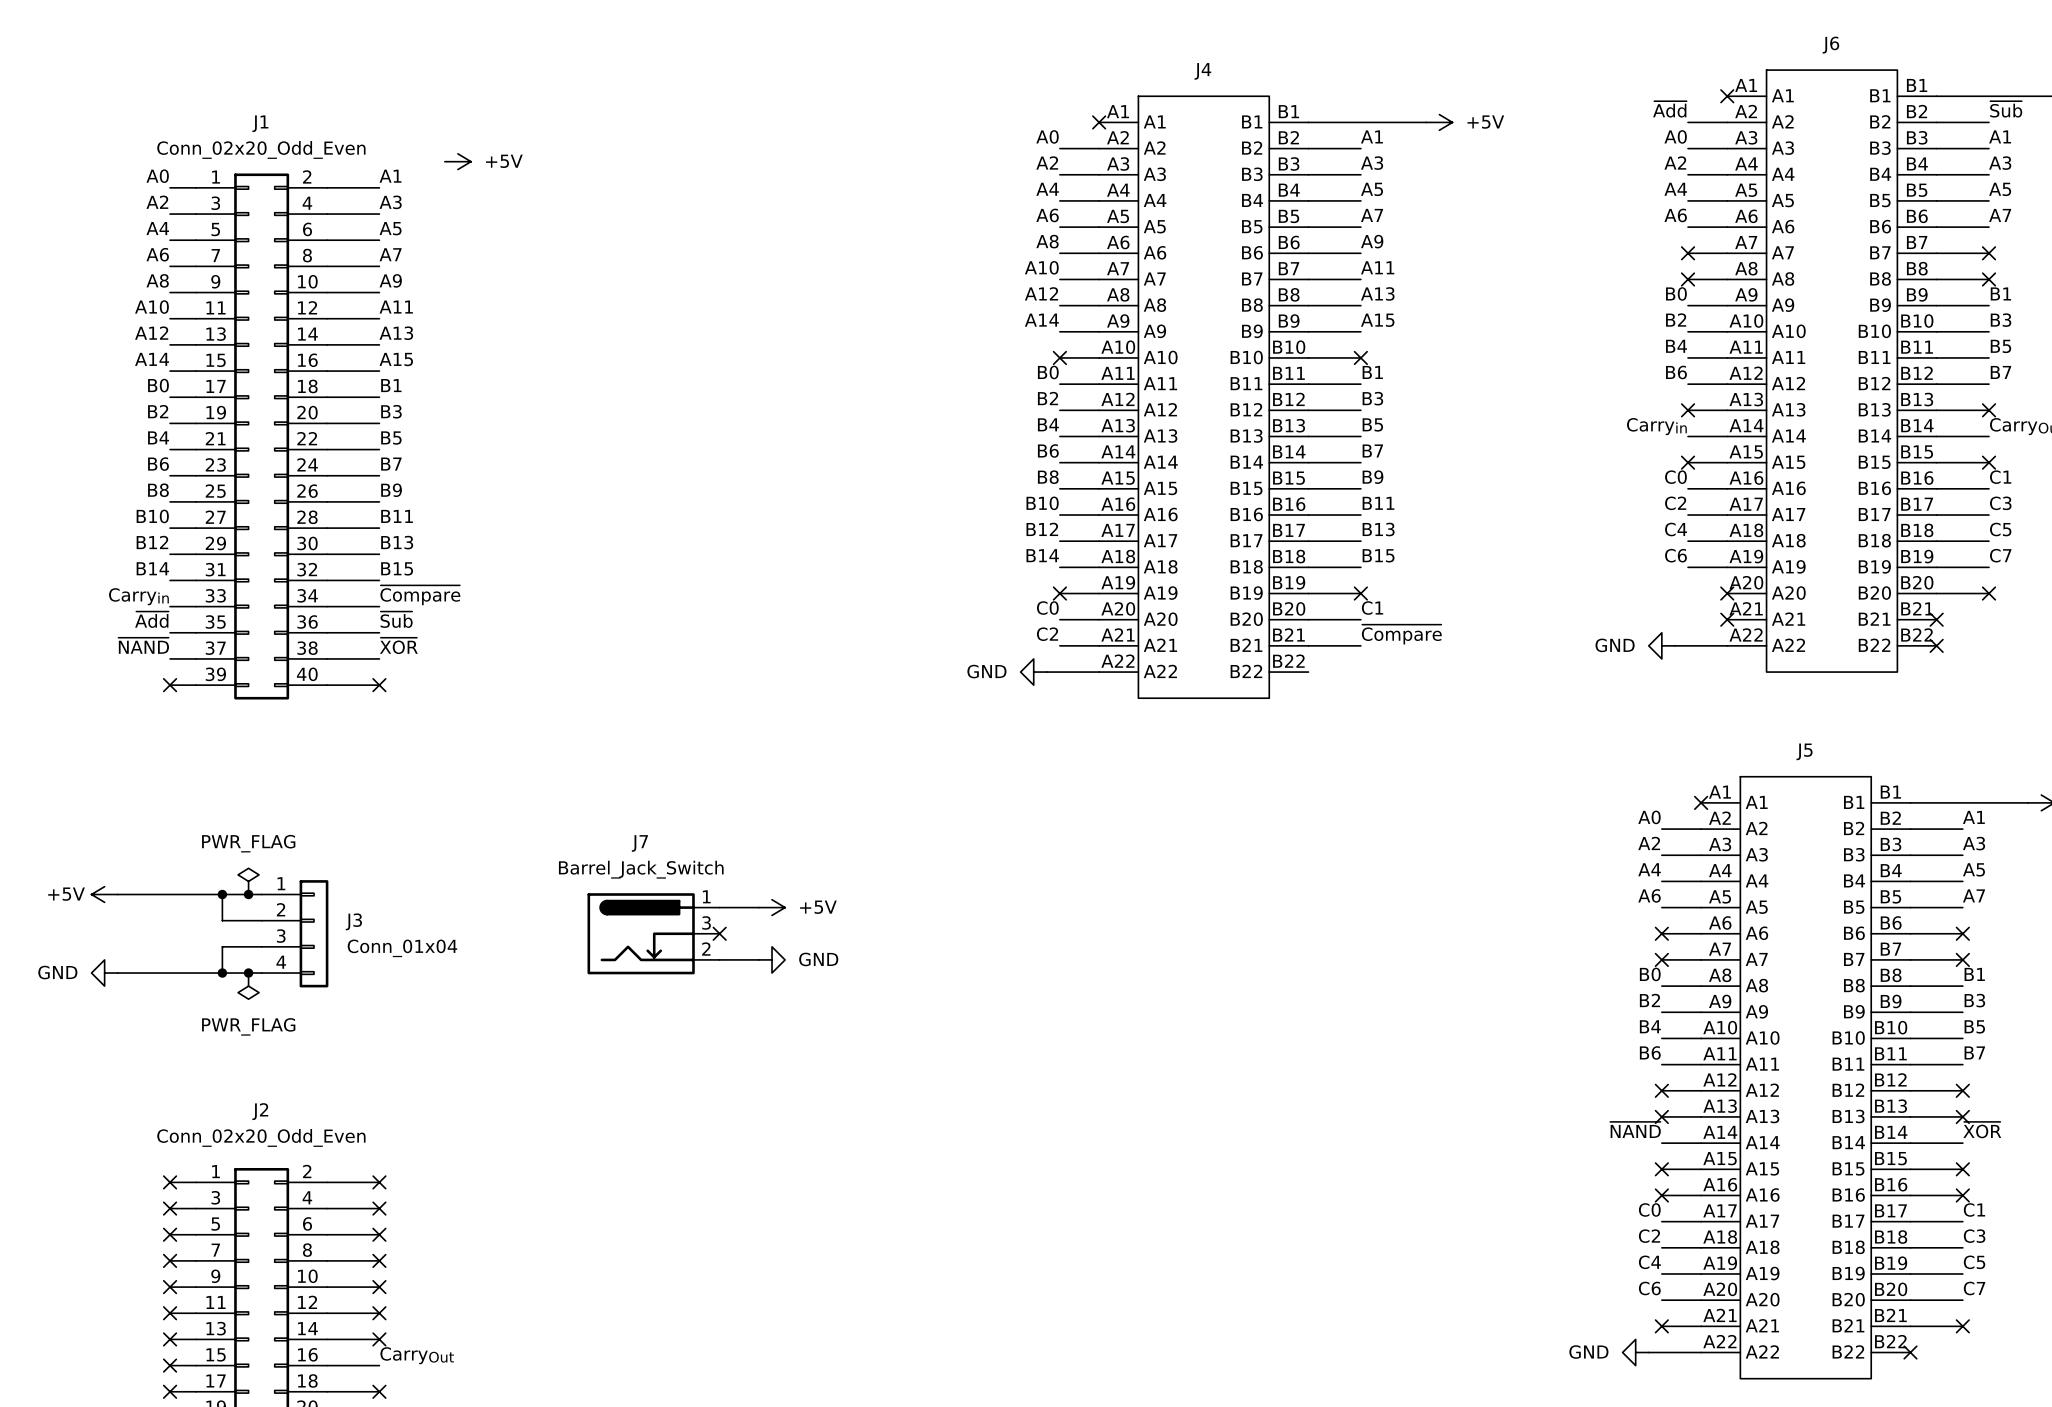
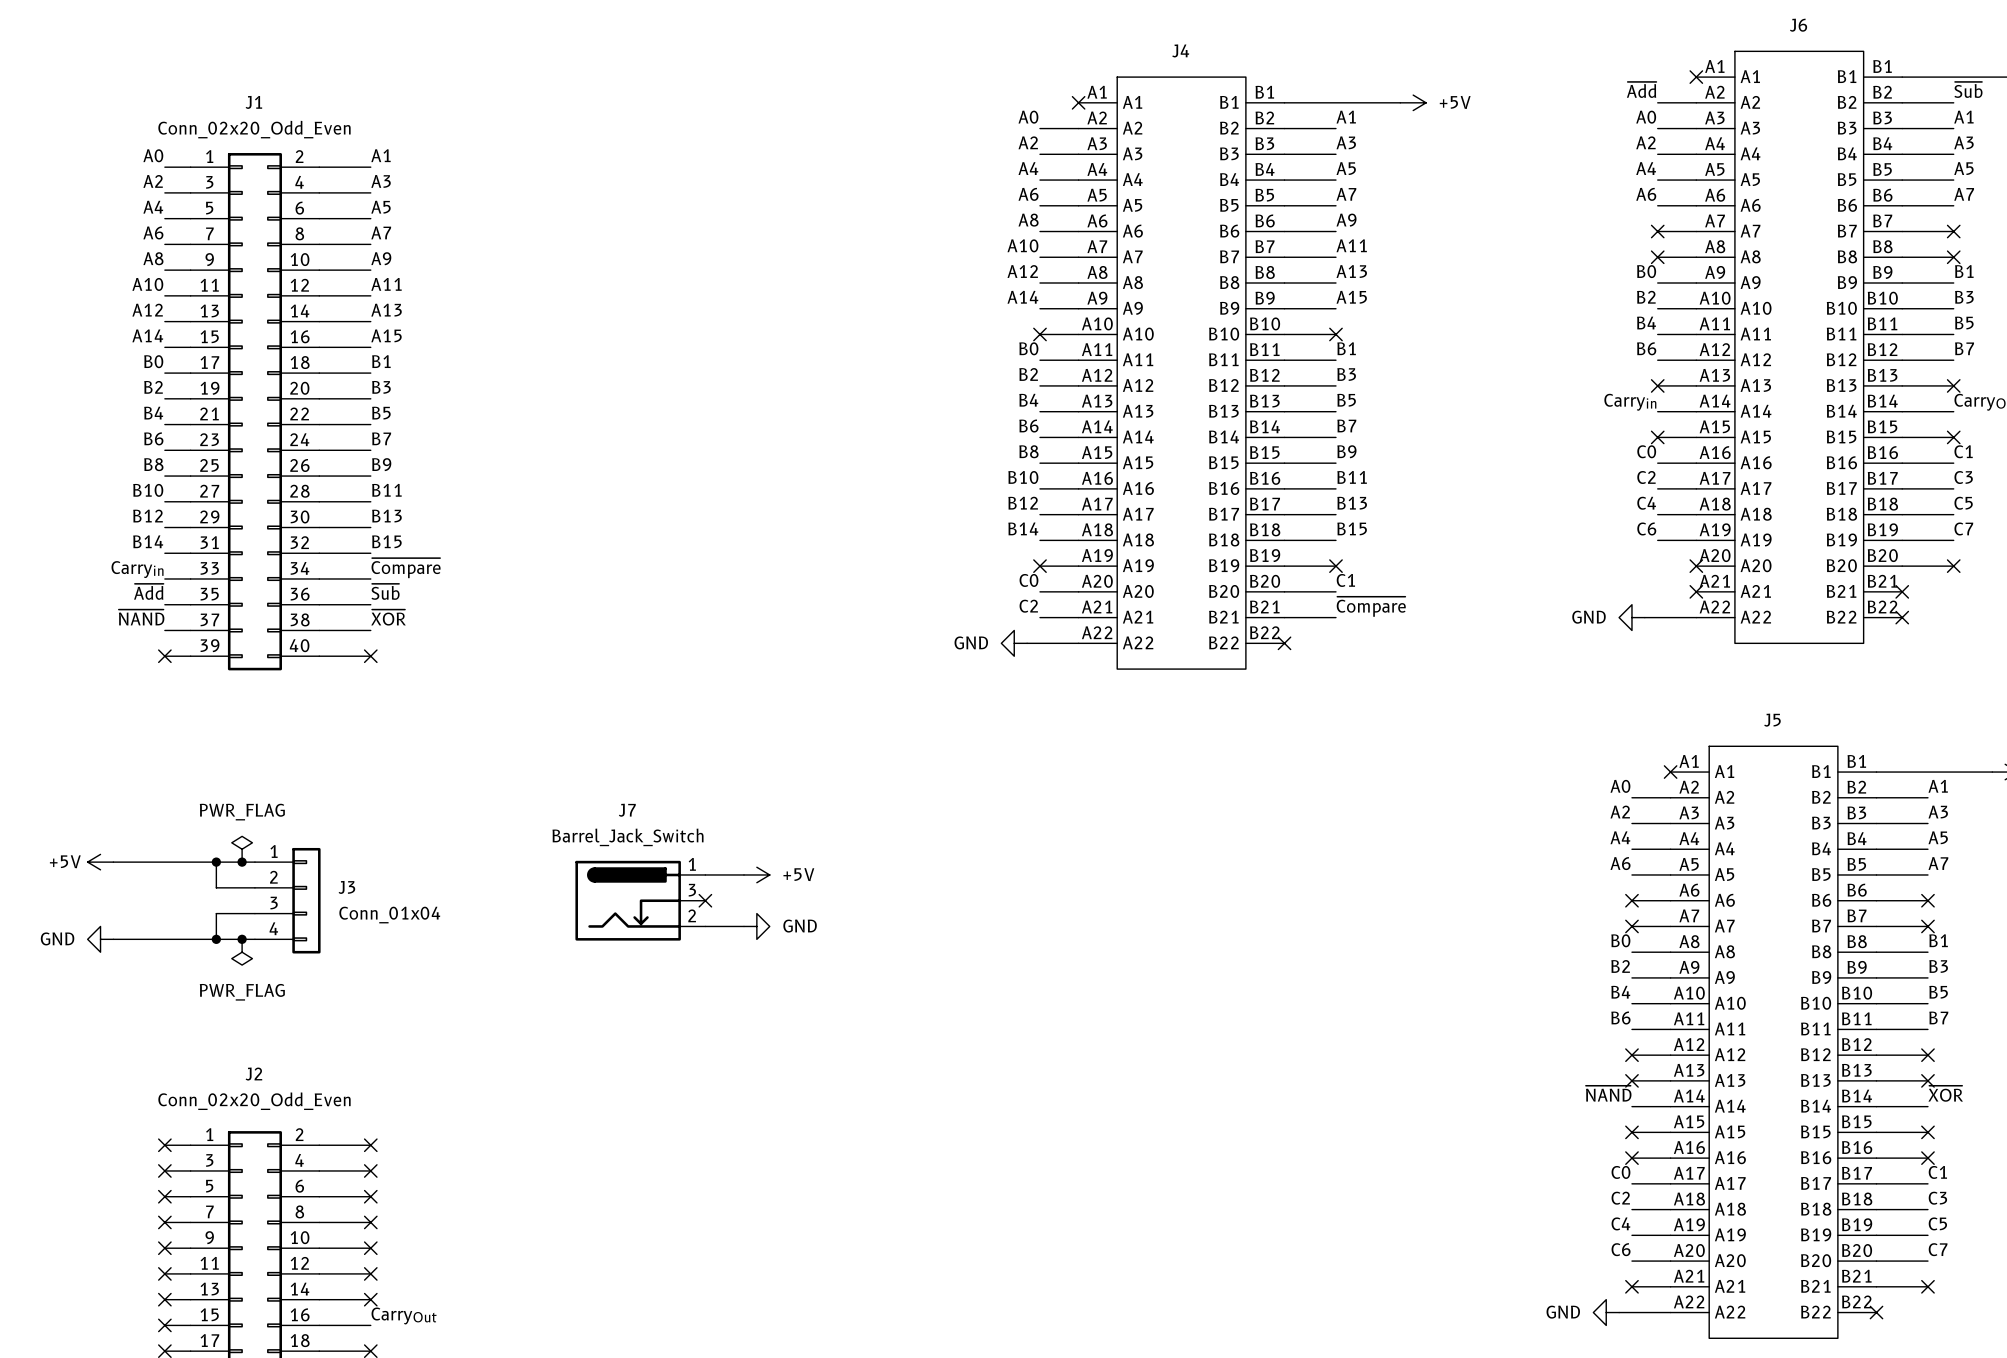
power symbol: +5V (457, 161) -> none
no-connect mark: none -> (1284, 643)

